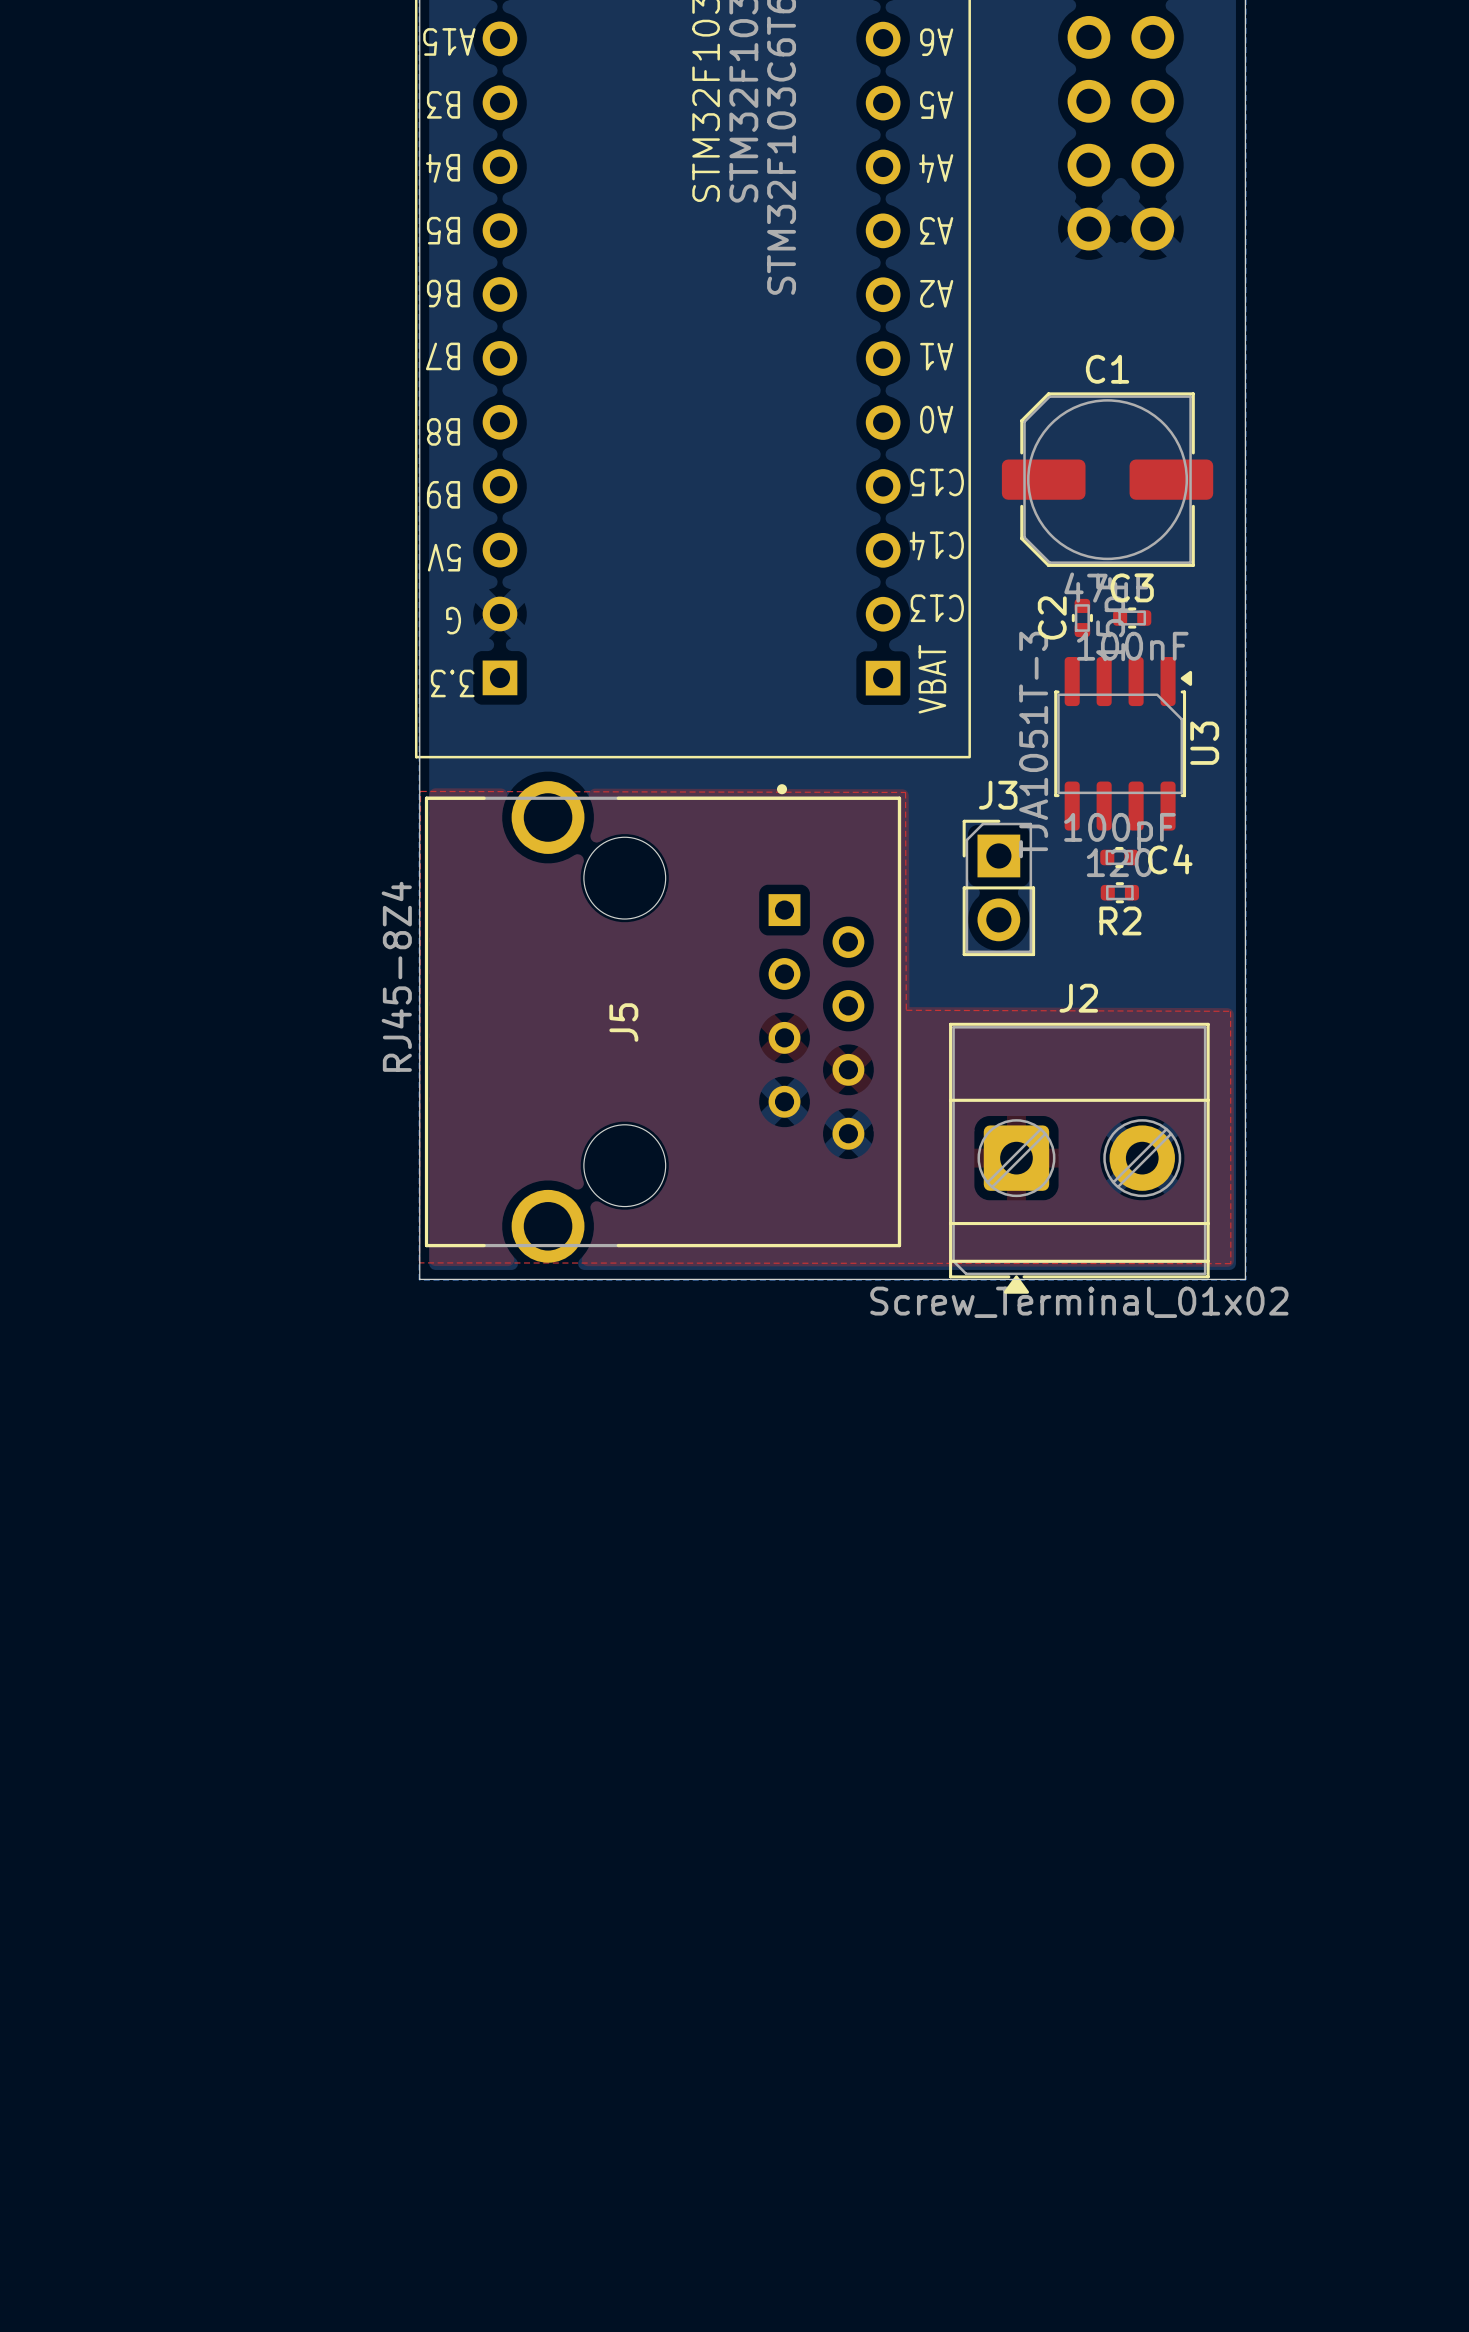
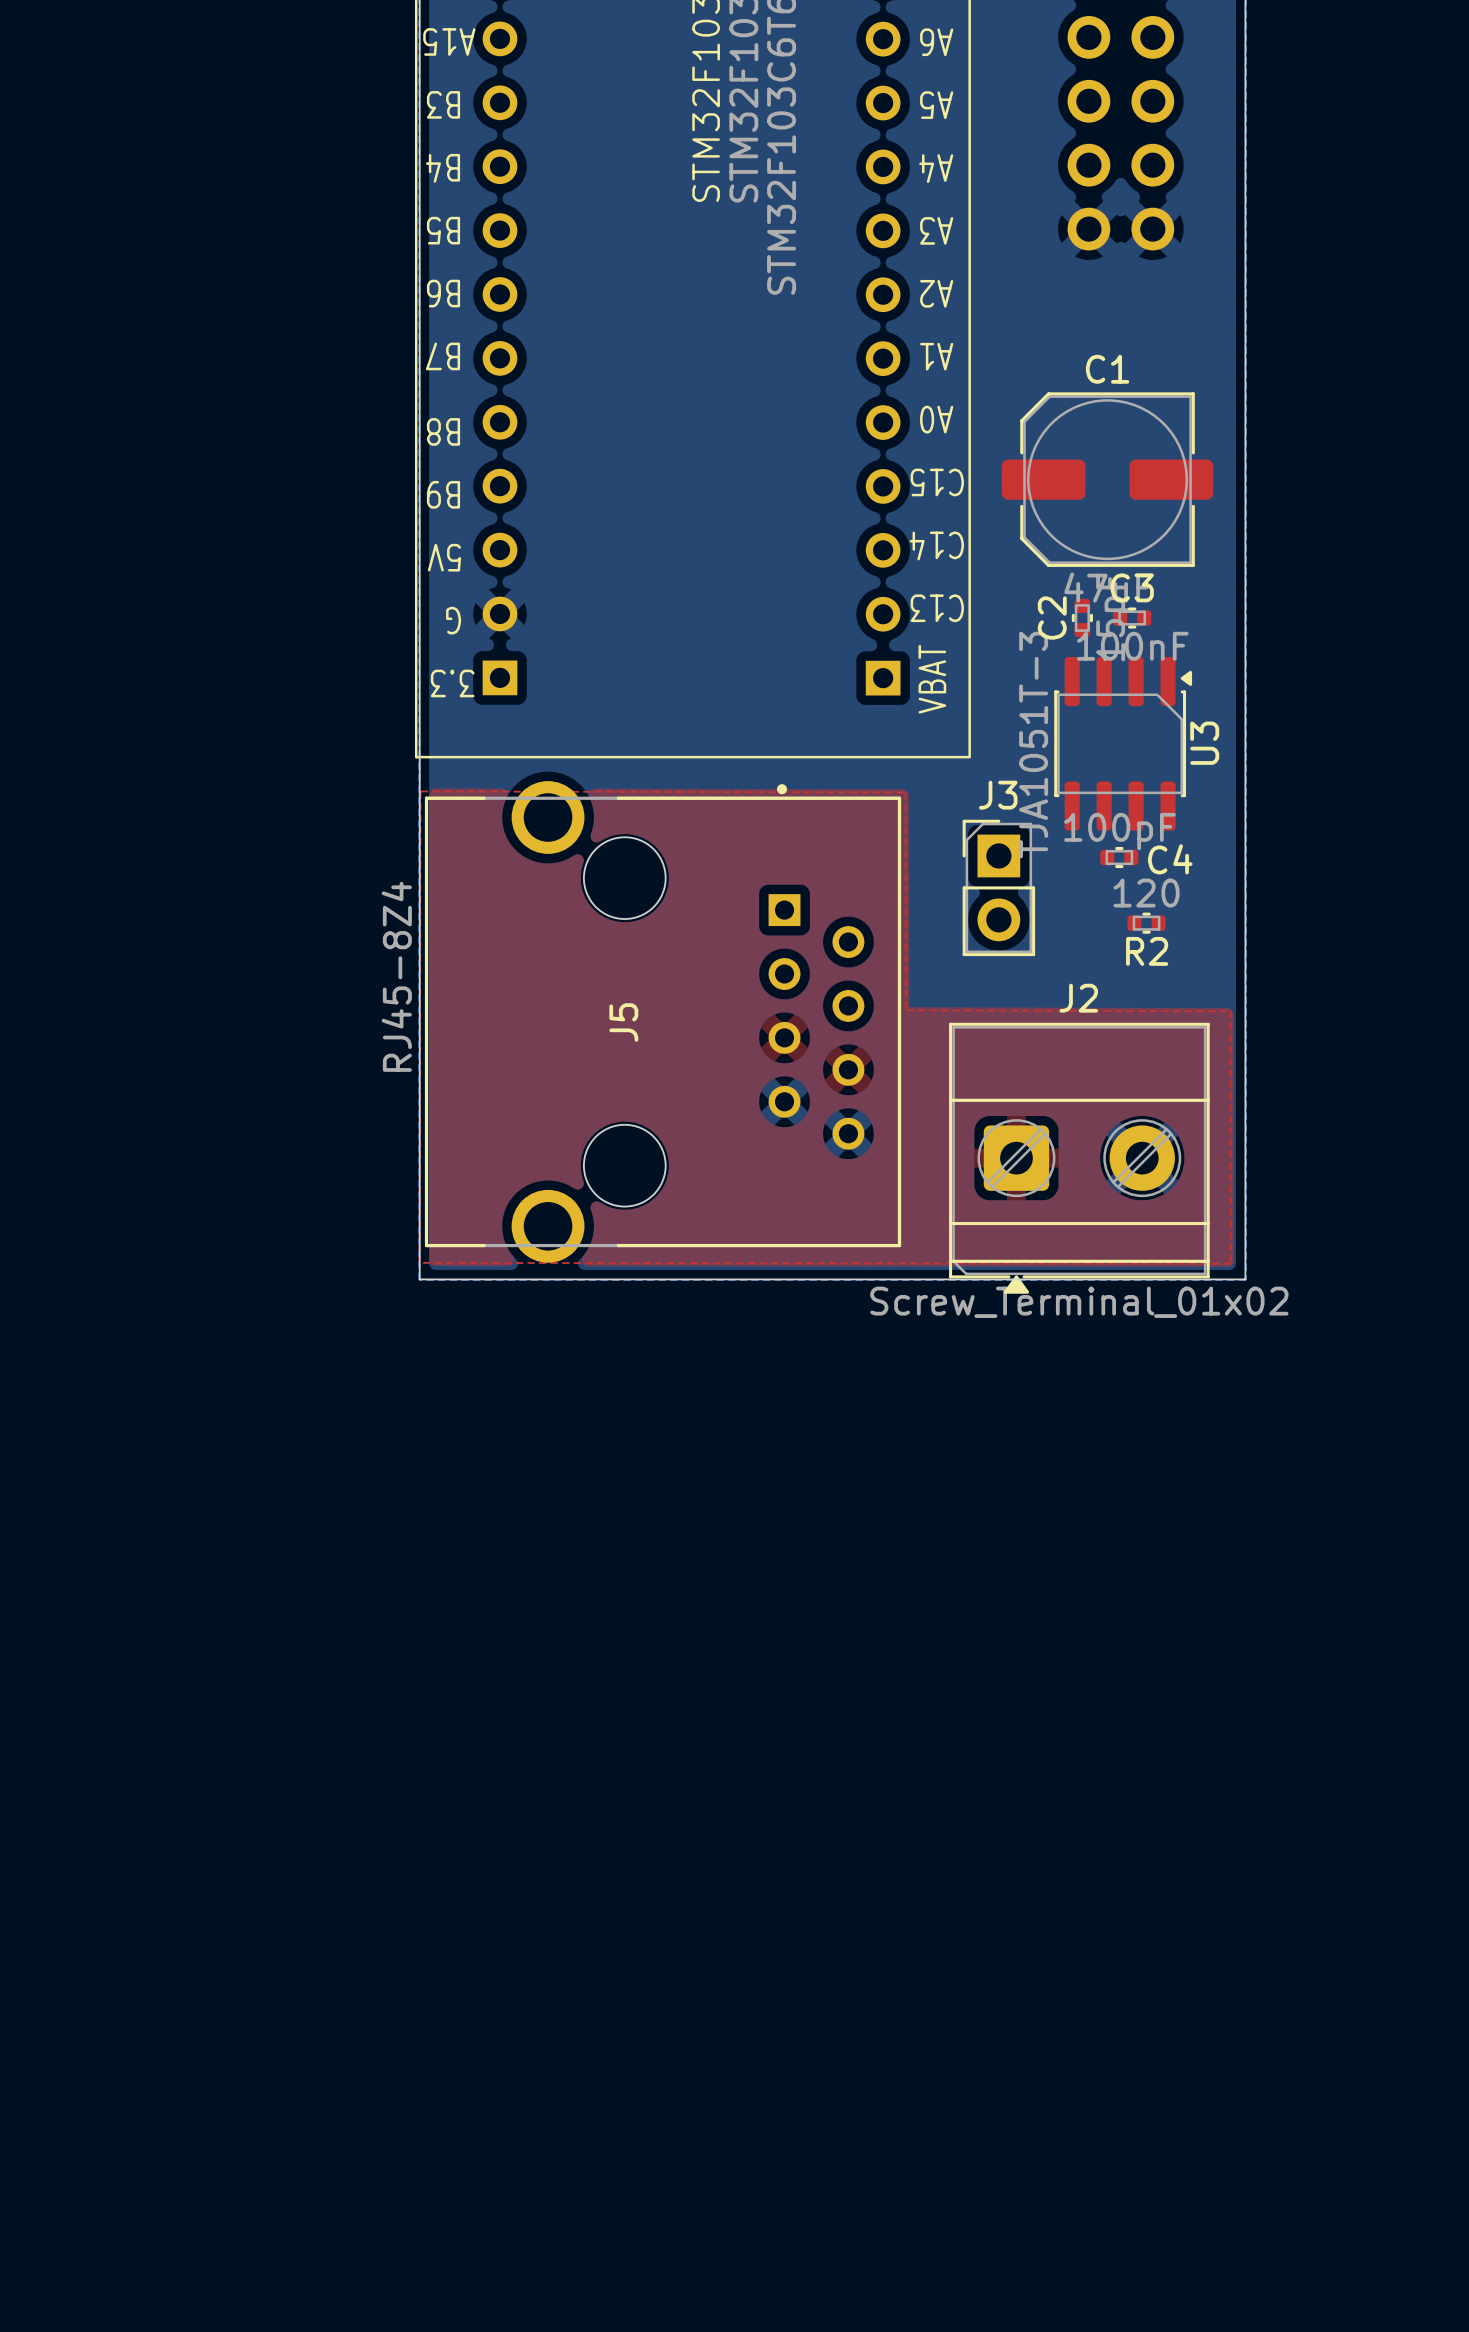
R2 position: (1119, 892) -> (1146, 923)

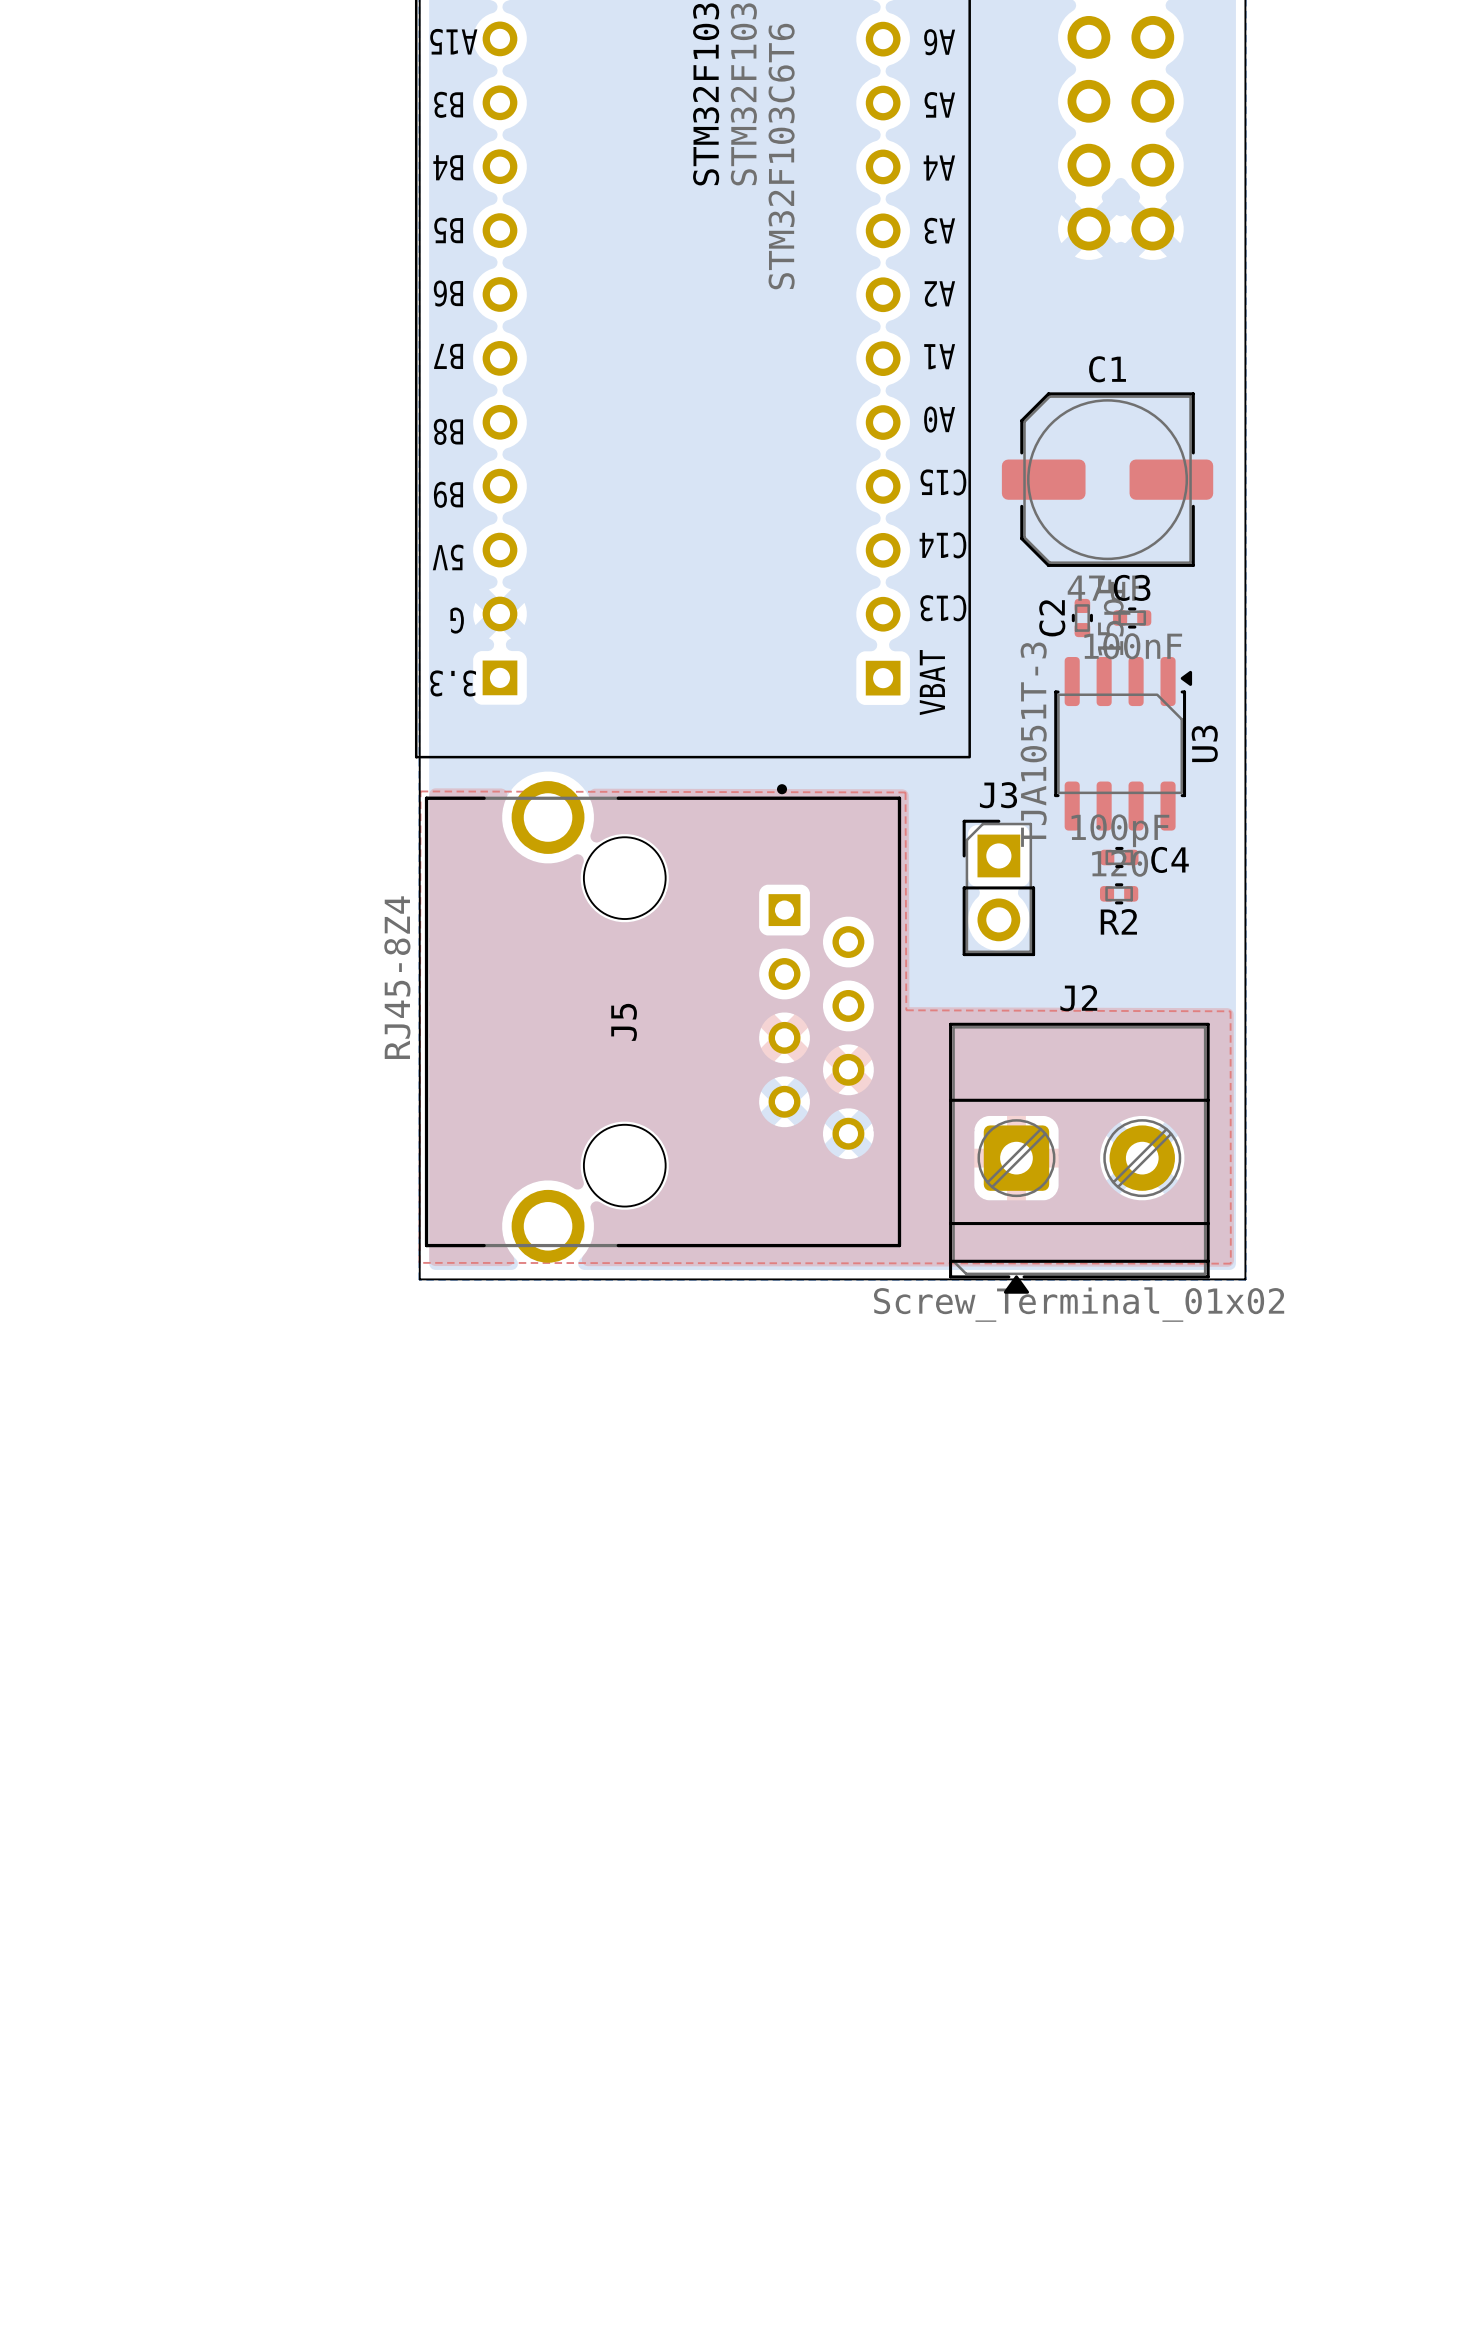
R2 position: (1146, 923) -> (1119, 893)

